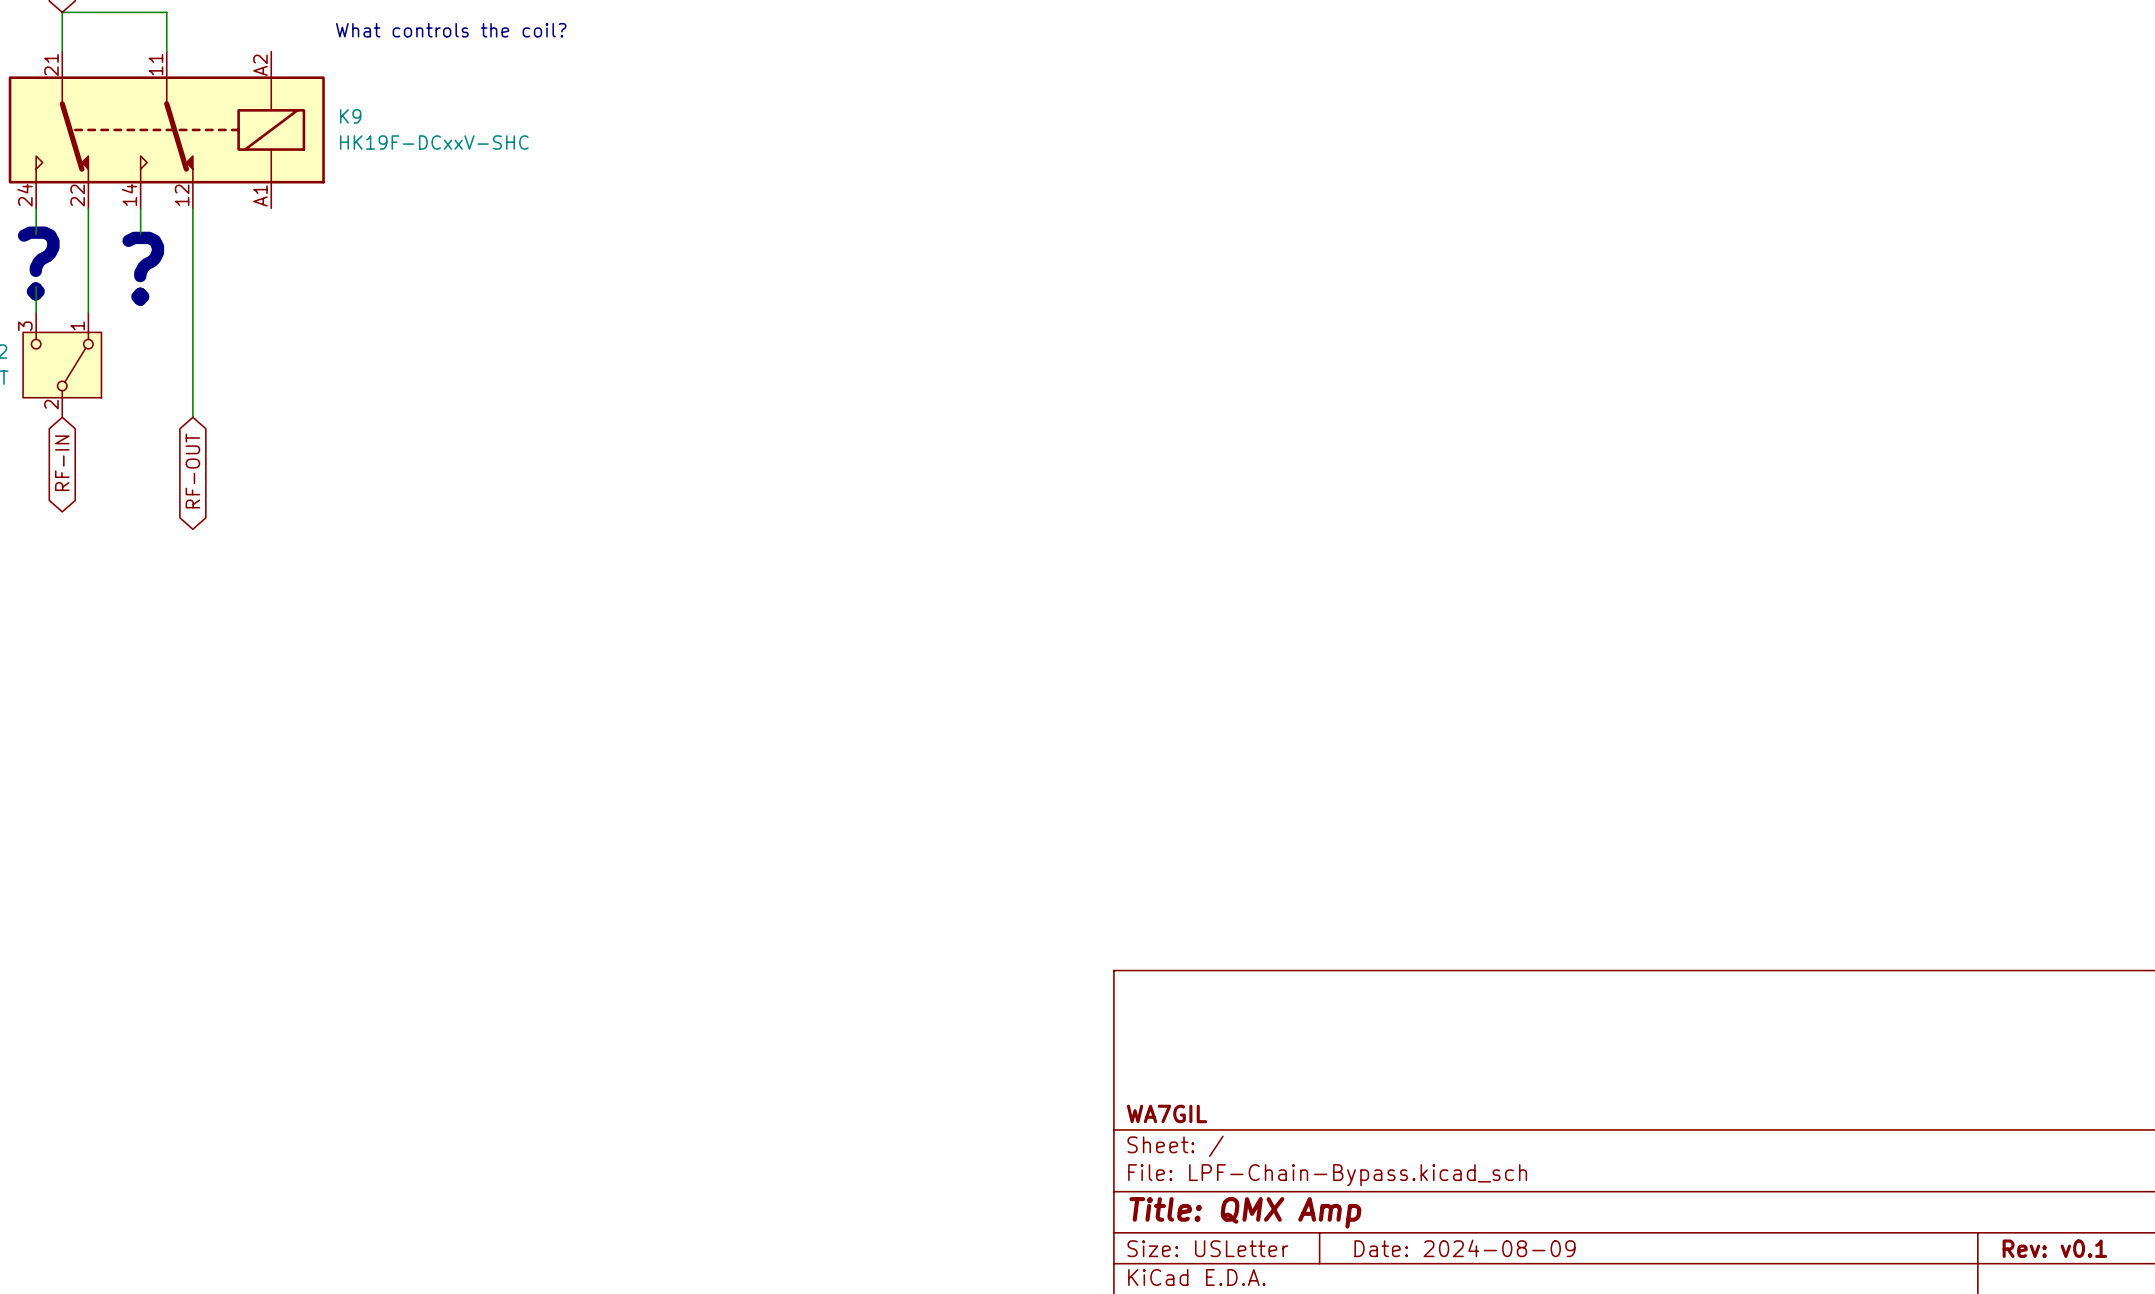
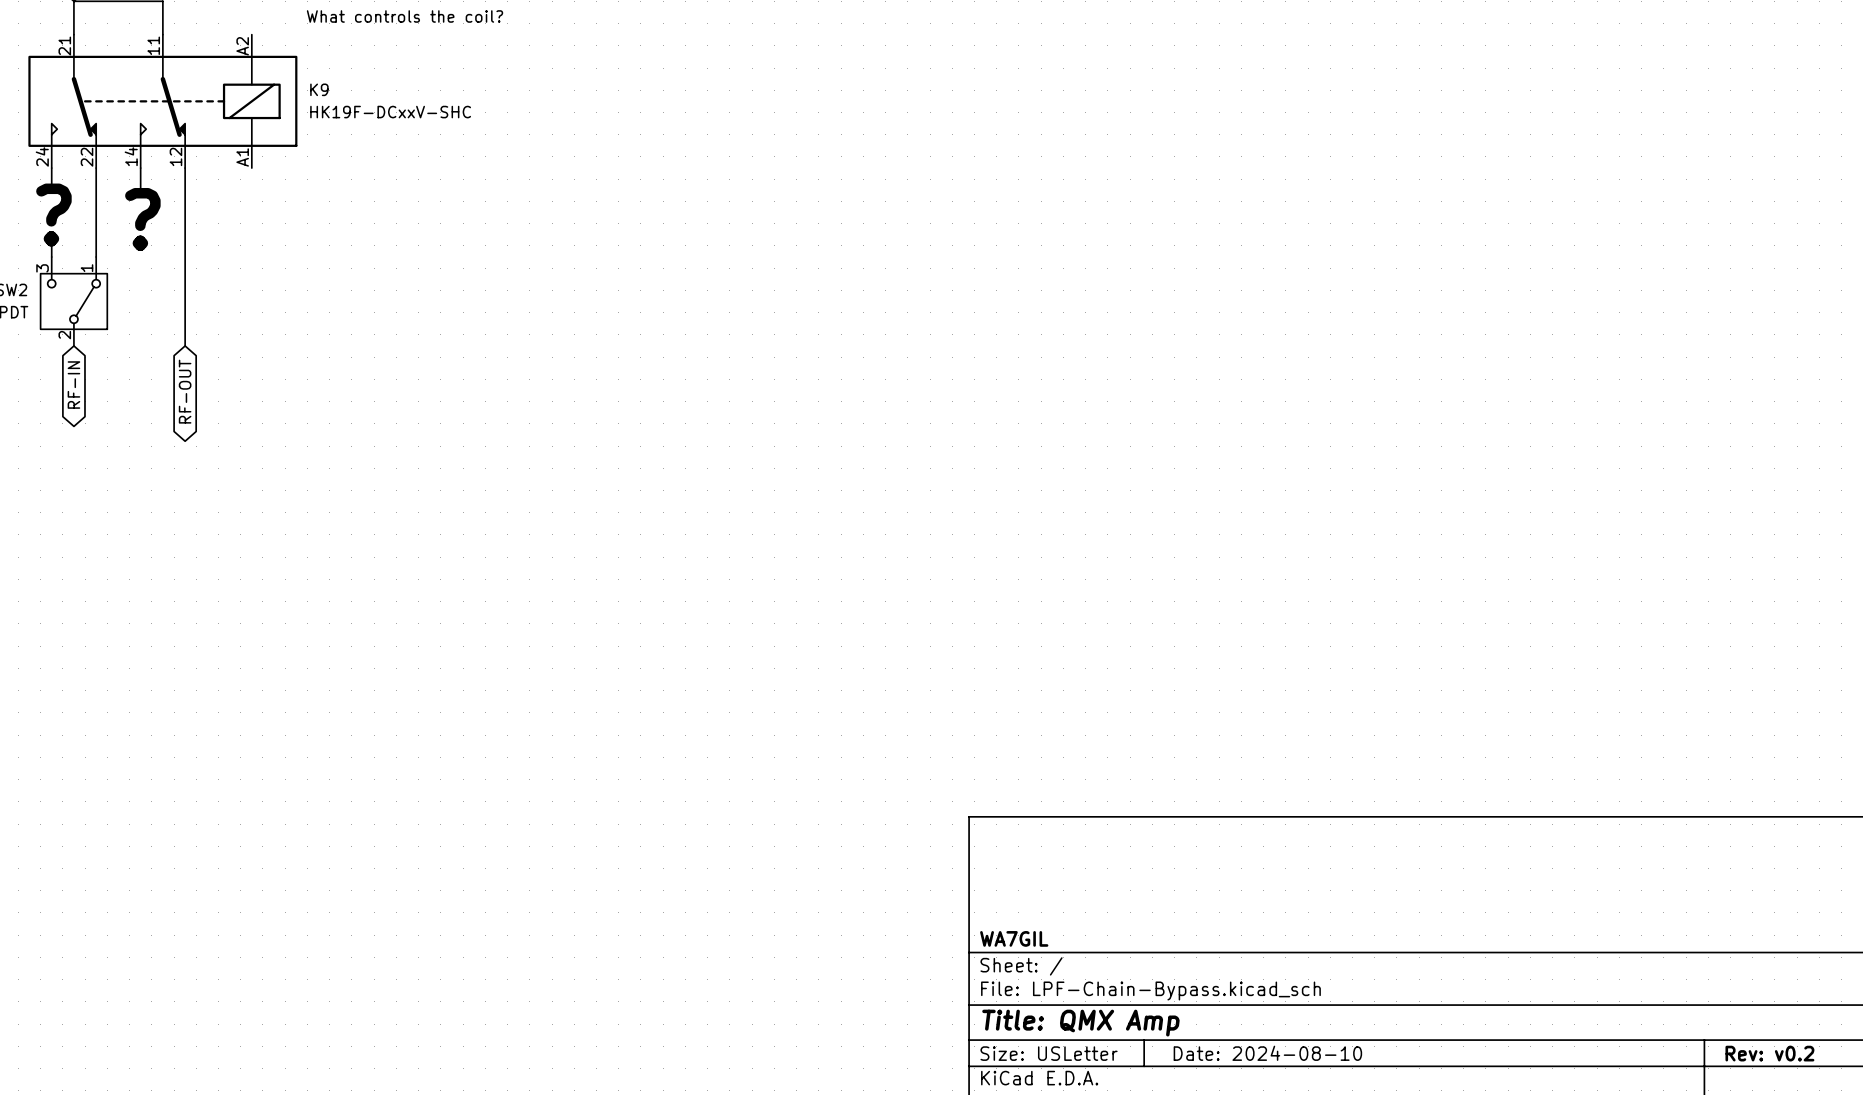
title block: Date: 2024-08-09 (1465, 1248) -> Date: 2024-08-10 (1267, 1053)
title block: Rev: v0.1 (2054, 1248) -> Rev: v0.2 (1769, 1053)

